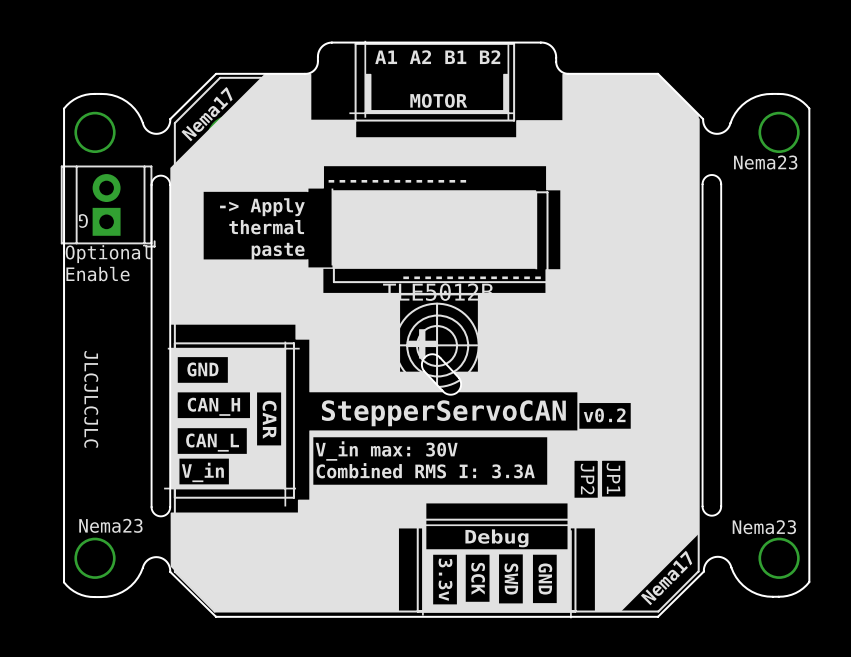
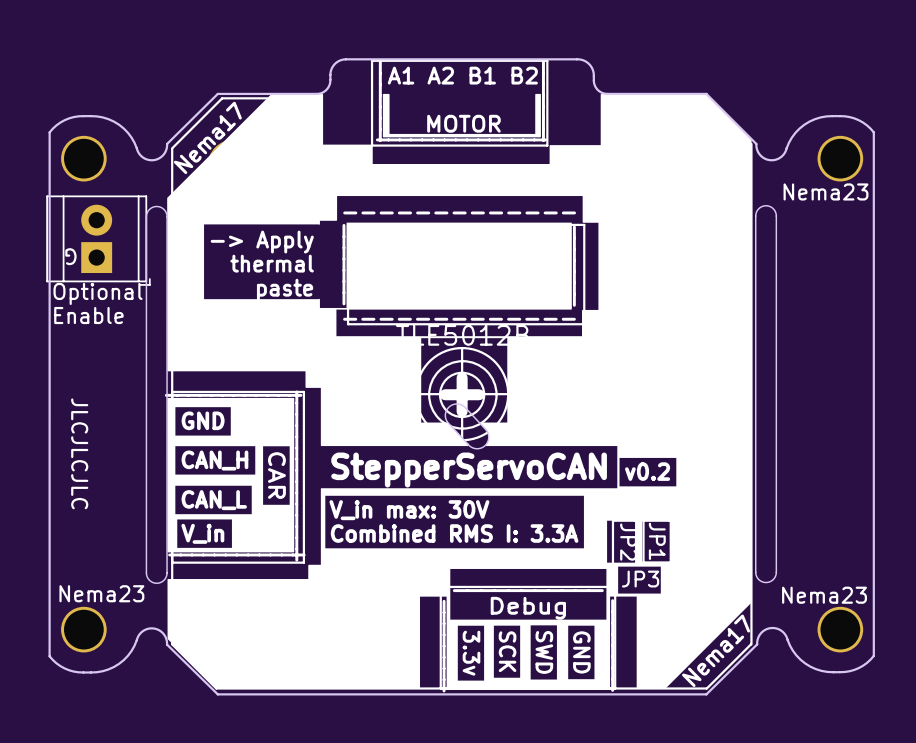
drawing shape: [170, 73, 699, 612] -> [167, 93, 752, 689]
JP3: none -> (640, 579)

